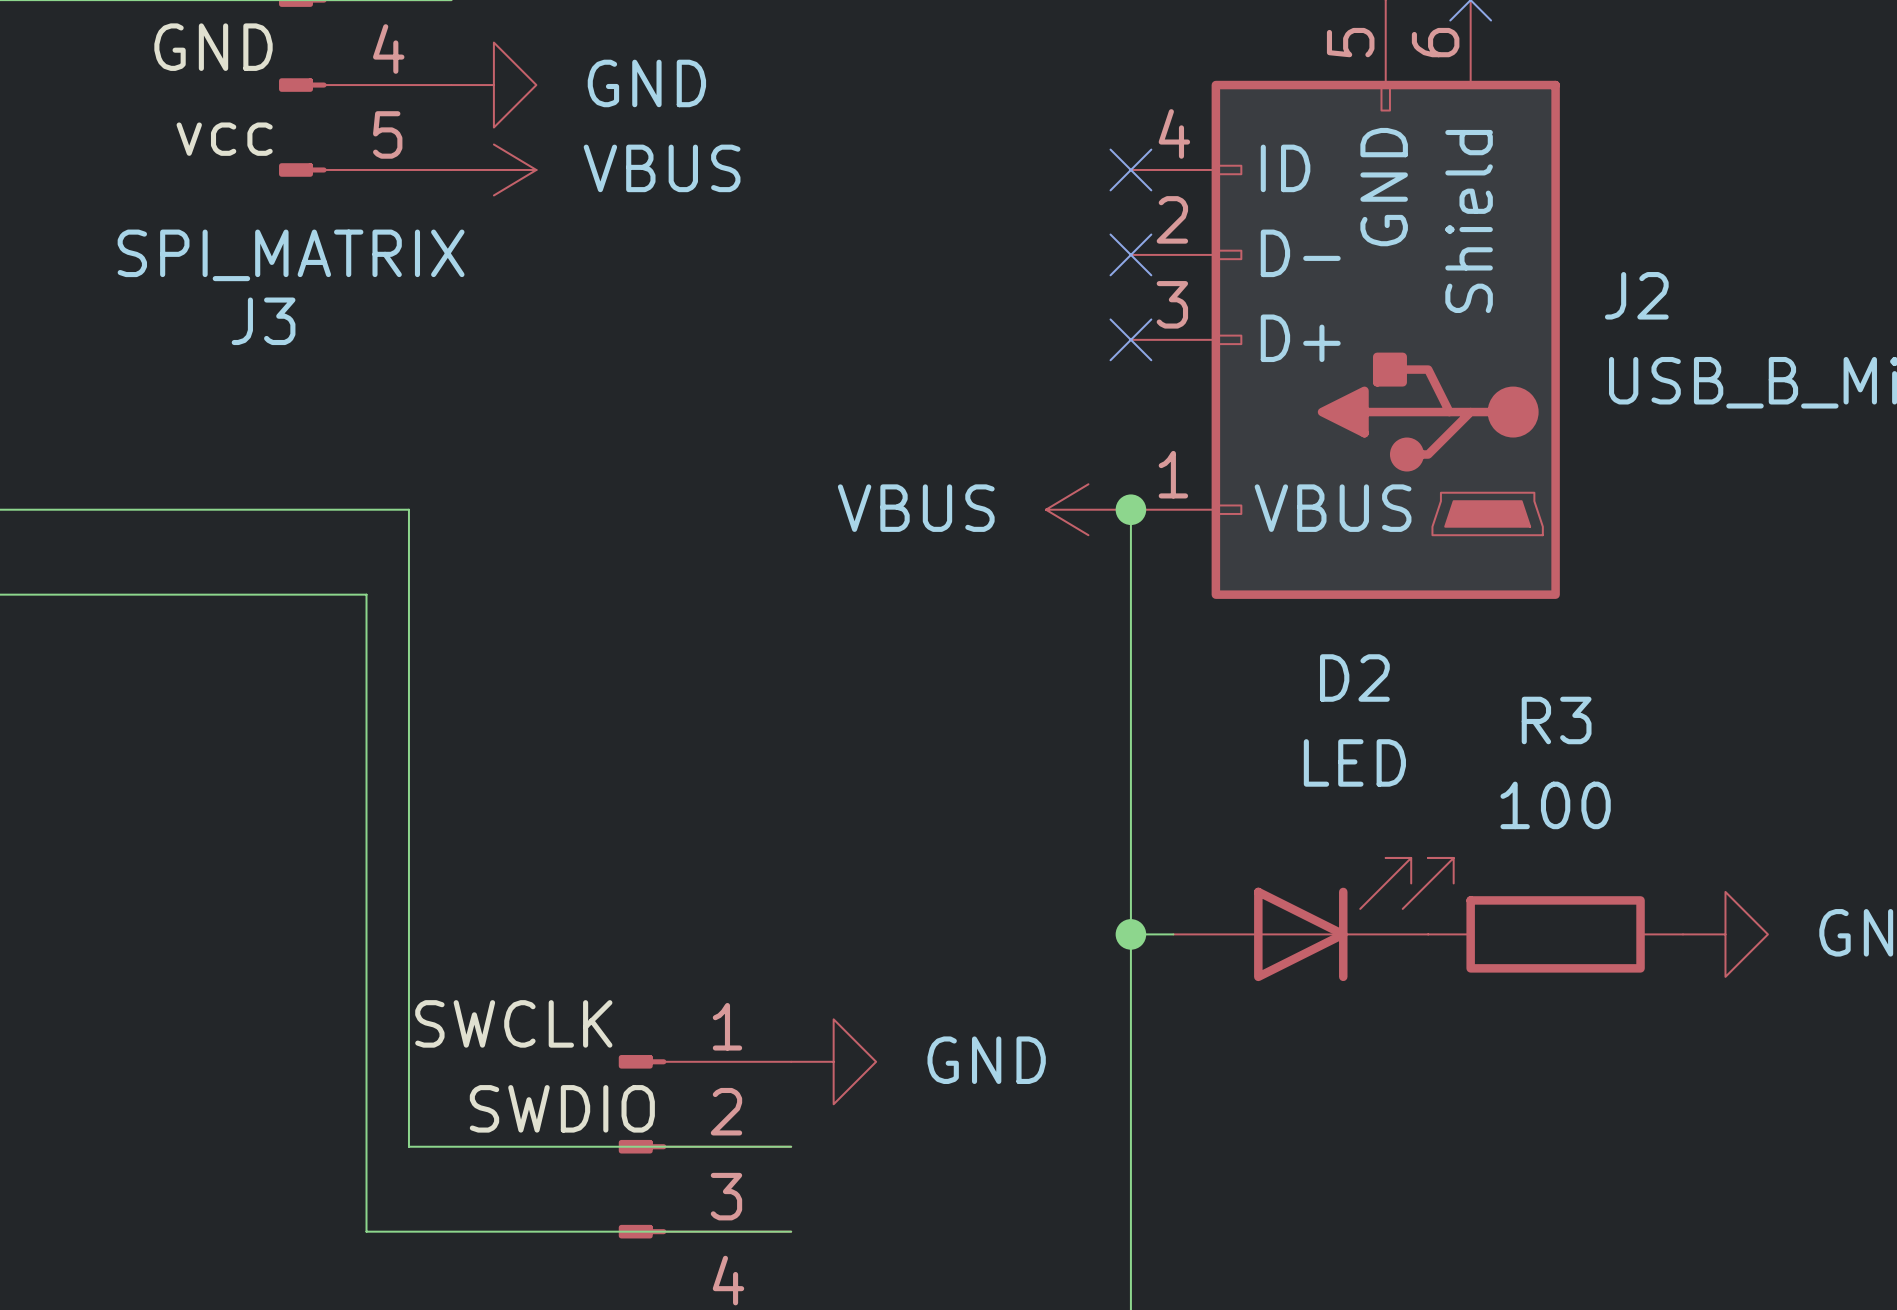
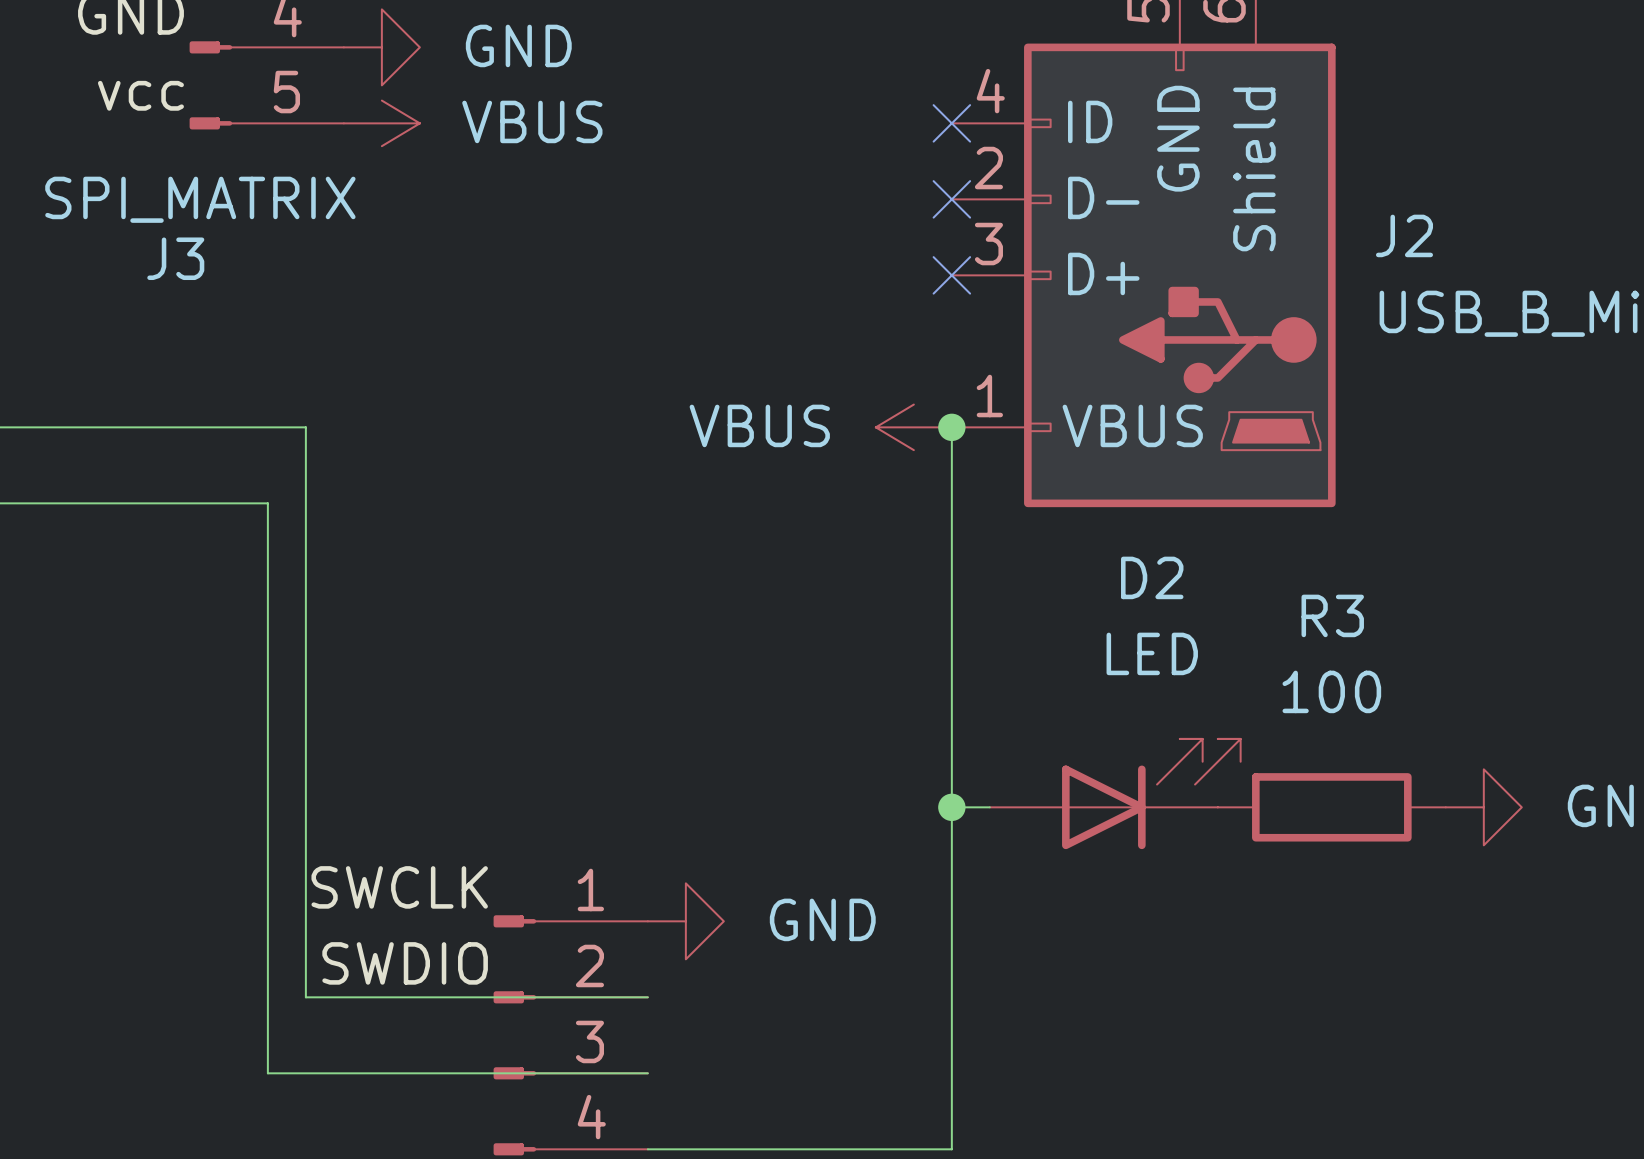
label position: SWDIO (562, 1108) -> SWDIO (405, 963)

